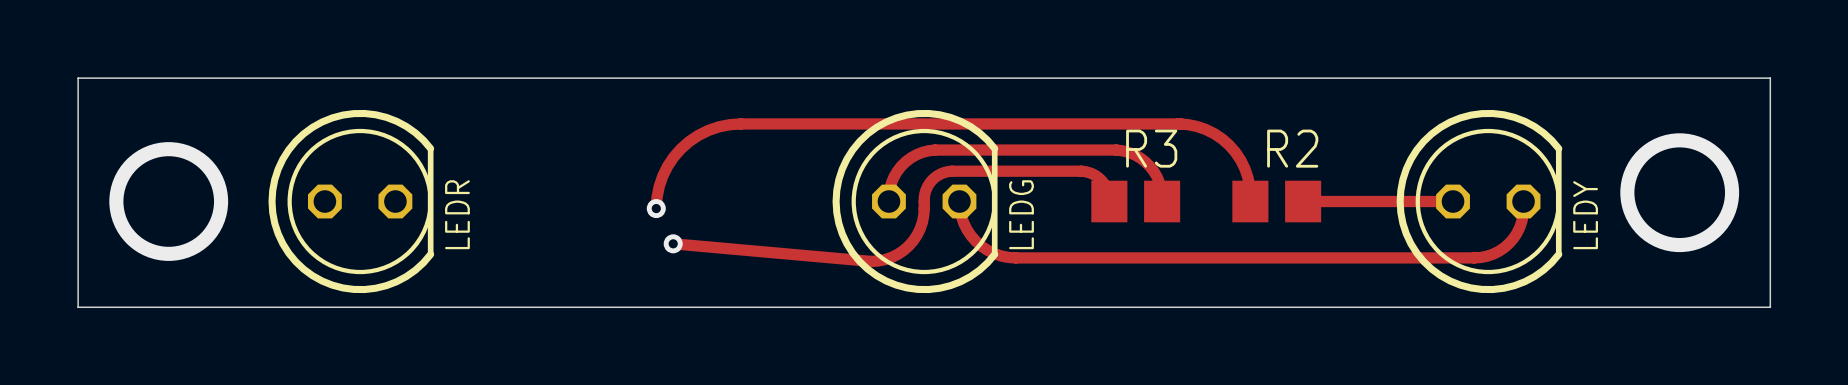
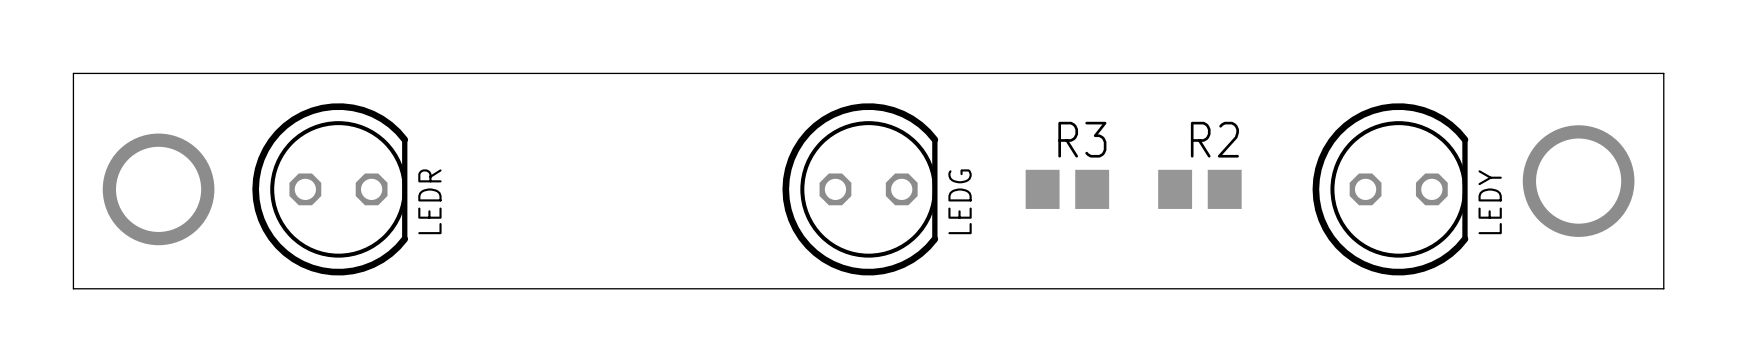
track: (1178, 123) (1205, 129) (1229, 145) (1244, 168) (1249, 186) (1250, 201) -> none
track: (1181, 123) (729, 124) (708, 130) (681, 148) (662, 176) (656, 208) -> none
track: (888, 201) (891, 182) (901, 166) (916, 154) (934, 150) (1122, 150) (1134, 154) (1149, 166) (1159, 182) (1162, 201) -> none
track: (959, 201) (963, 223) (975, 241) (994, 253) (1015, 257) (1480, 257) (1498, 251) (1513, 238) (1521, 221) (1523, 201) -> none
track: (1109, 201) (1103, 183) (1095, 175) (1084, 171) (951, 171) (937, 175) (927, 186) (924, 197) (922, 222) (913, 240) (897, 254) (885, 259) (871, 261) (673, 243) -> none
track: (1303, 201) (1453, 201) -> none
via: (656, 208) -> none
via: (673, 243) -> none

